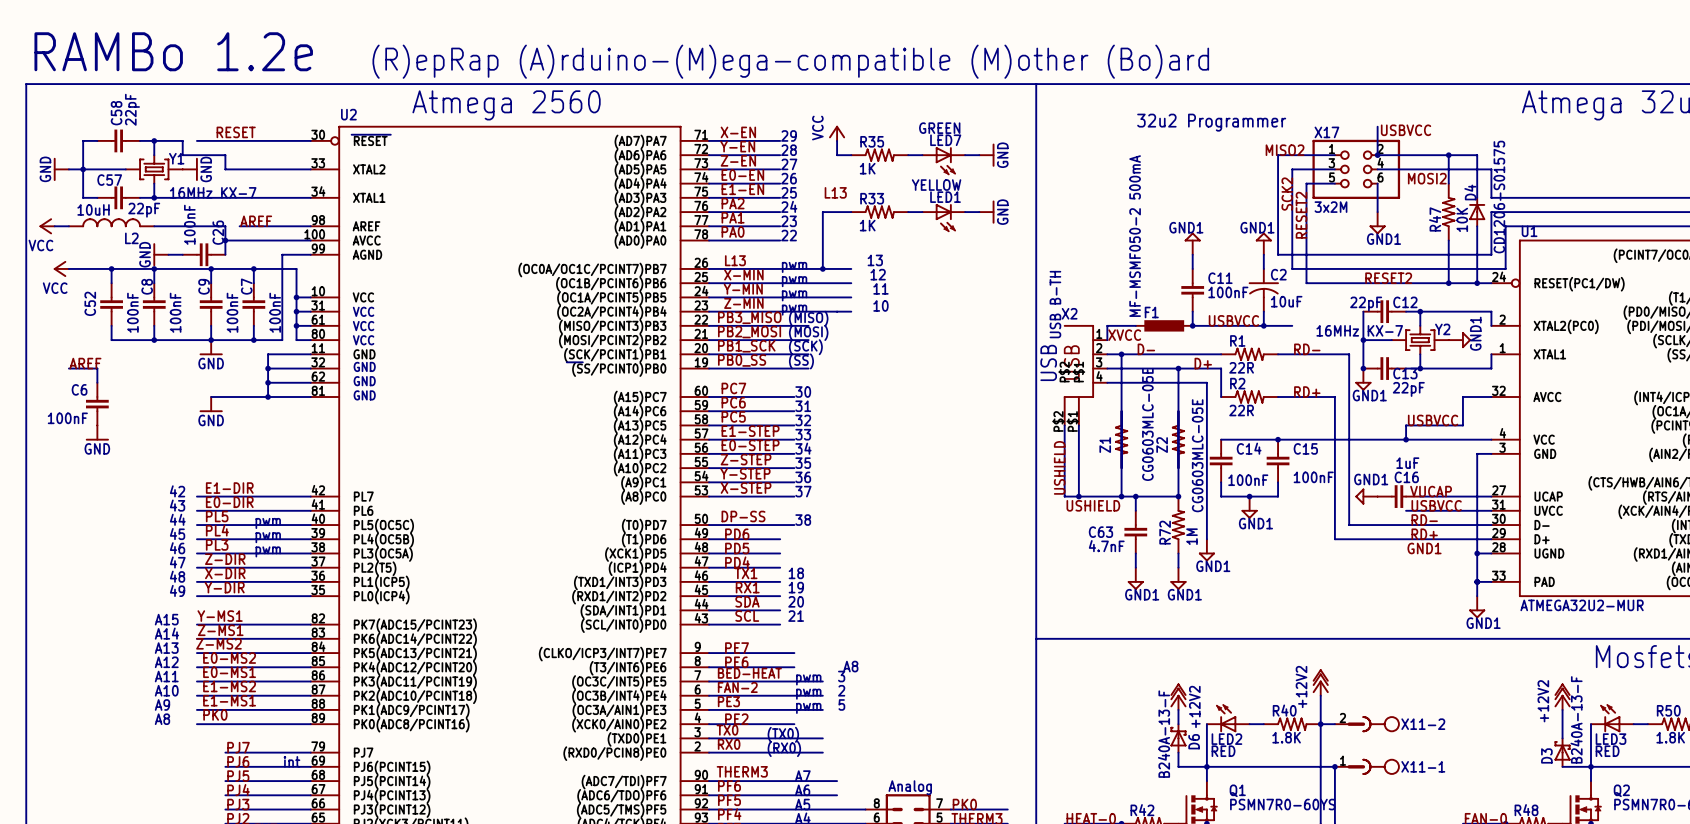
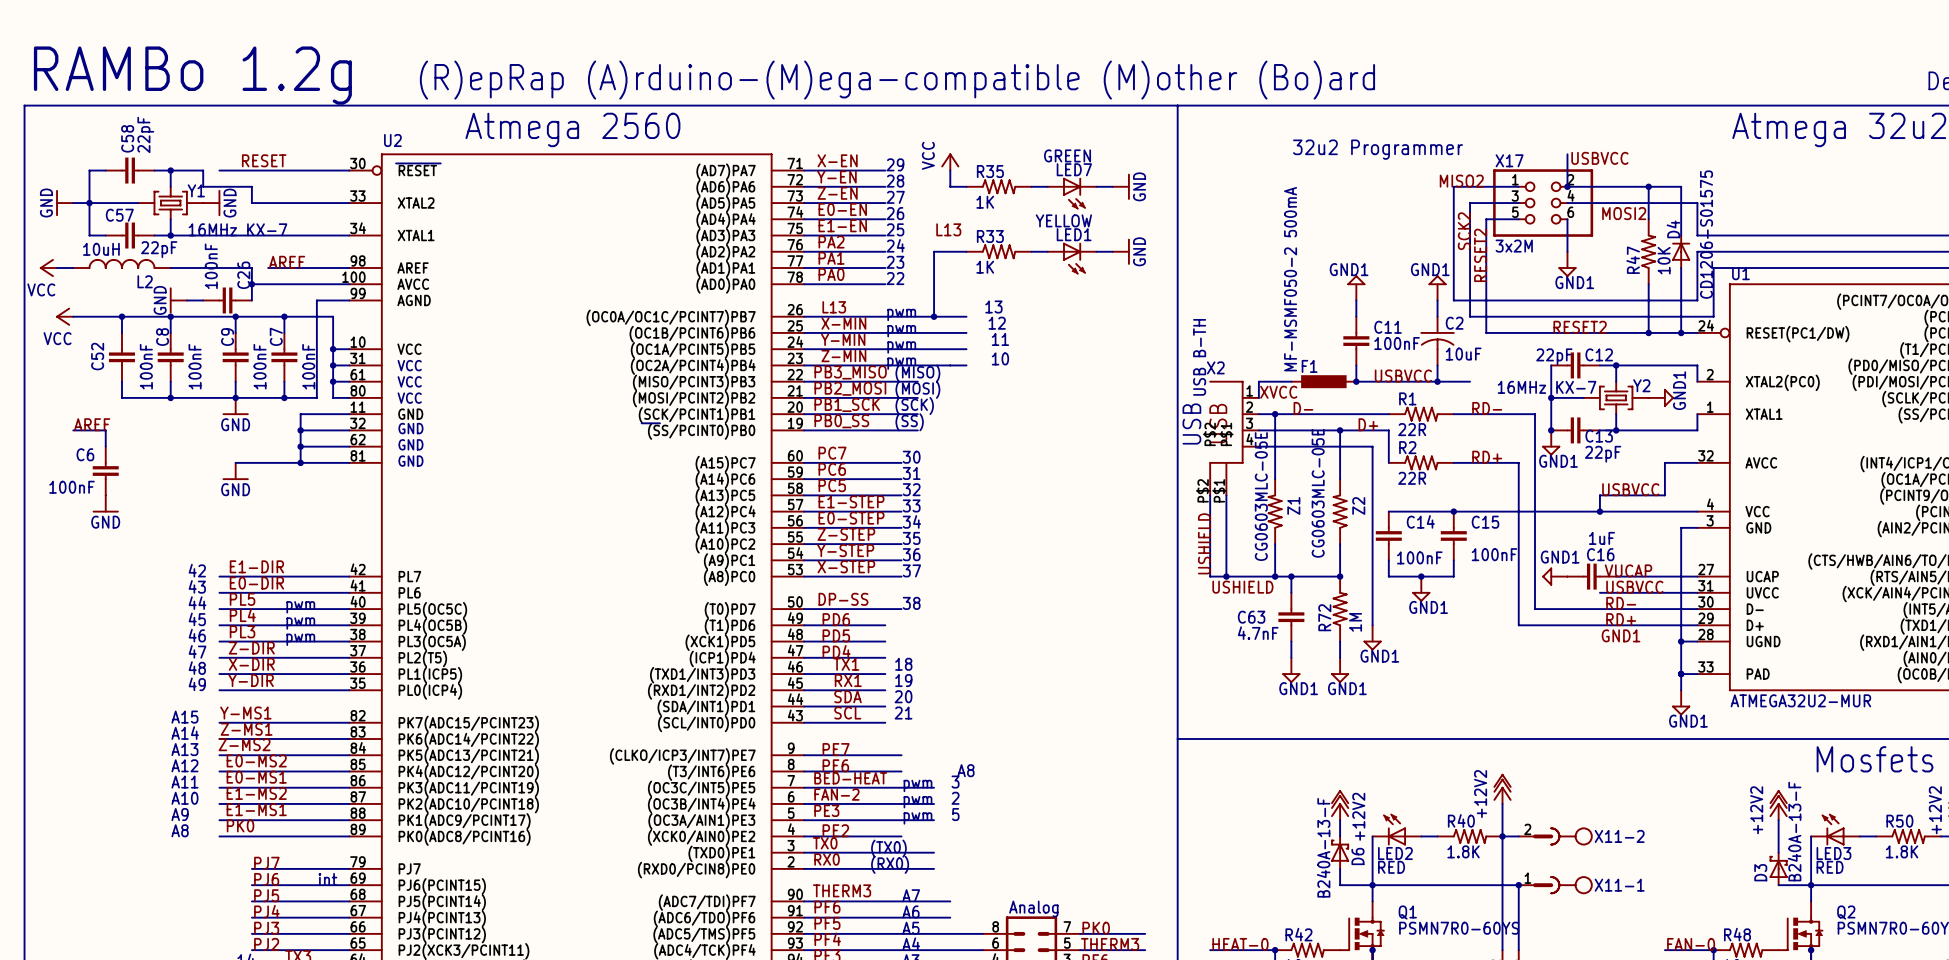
text: RAMBo 1.2e (173, 51) -> RAMBo 1.2g (192, 75)
Z1 value position: CG0603MLC-05E (1147, 424) -> CG0603MLC-05E (1261, 496)
Z1 rotation: 0° (1121, 439) -> 180° (1275, 511)
Z2 rotation: 0° (1178, 439) -> 180° (1340, 511)

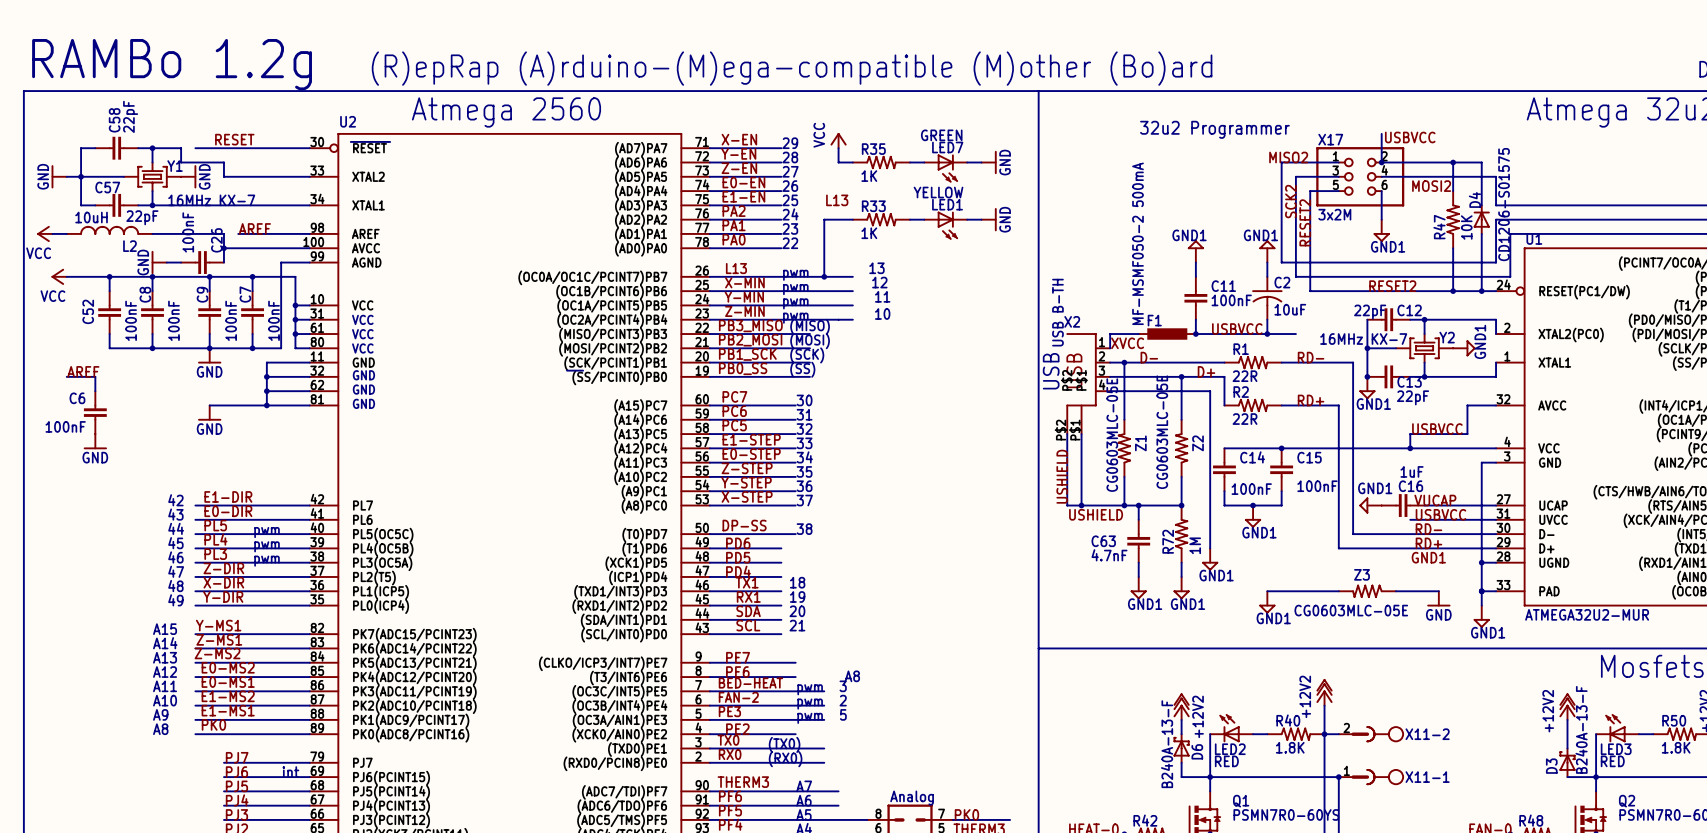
wire: none -> (1267, 591) (1338, 591)
Z3: none -> CG0603MLC-05E (1367, 591)
wire: none -> (1395, 591) (1438, 591)
power symbol: none -> GND (1438, 598)
power symbol: none -> GND1 (1267, 602)

